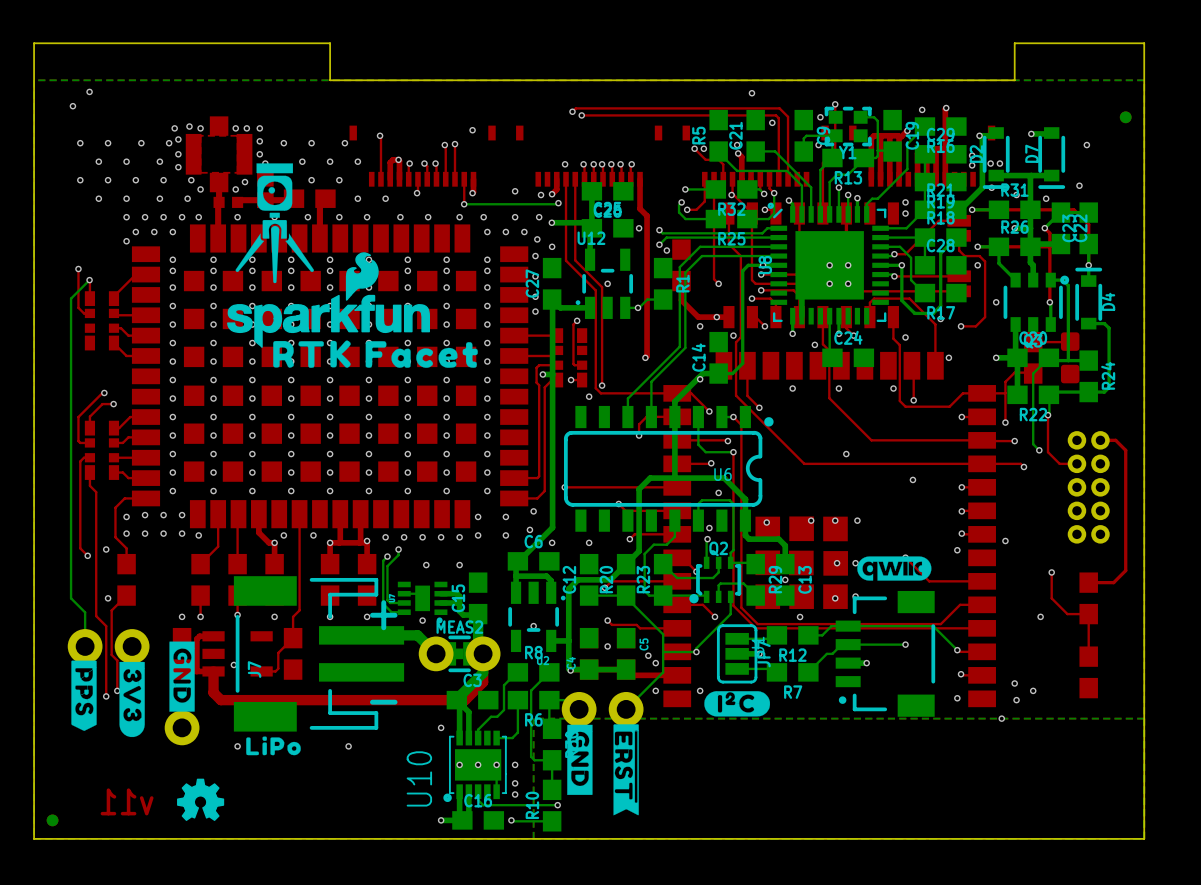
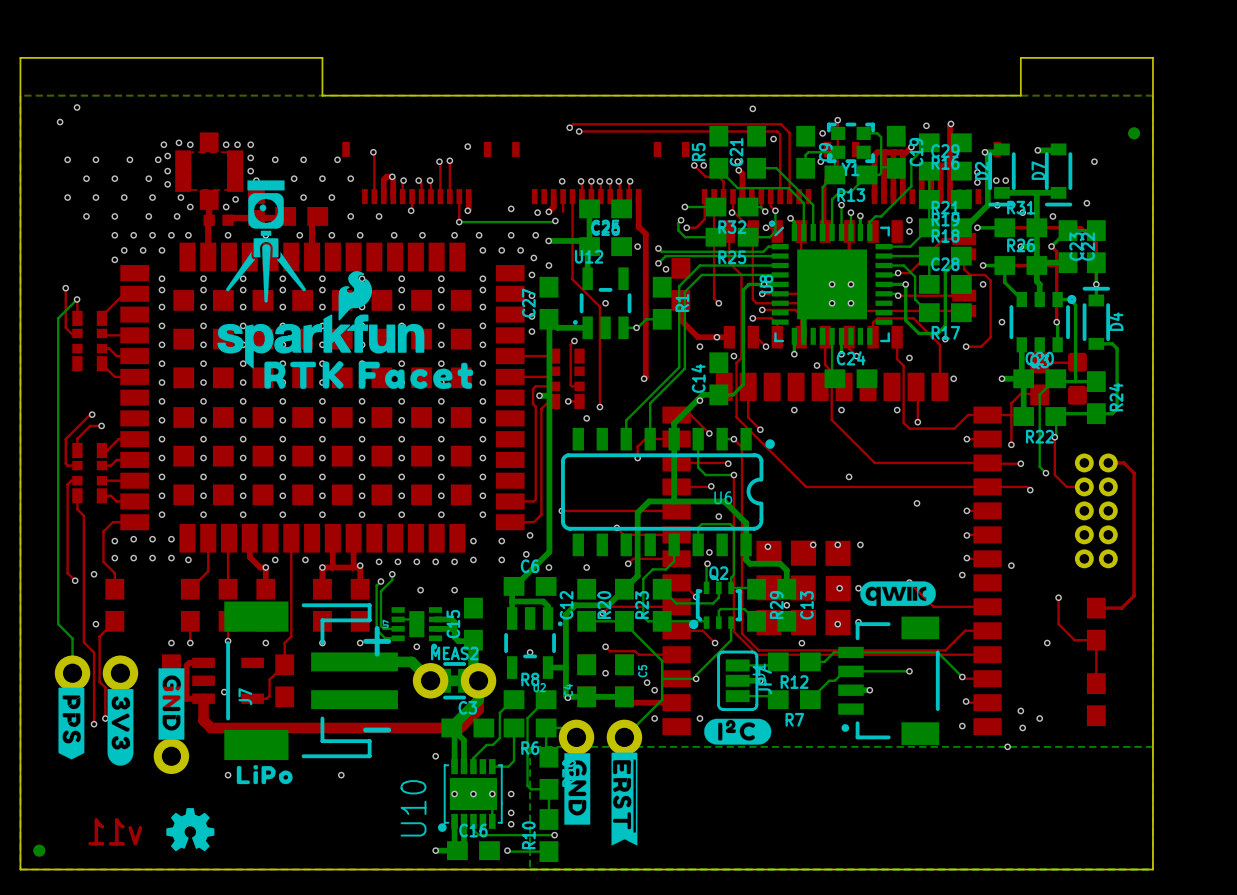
top track: (566, 194) (566, 260) (595, 290) (595, 388) (600, 393) (677, 393) -> none

